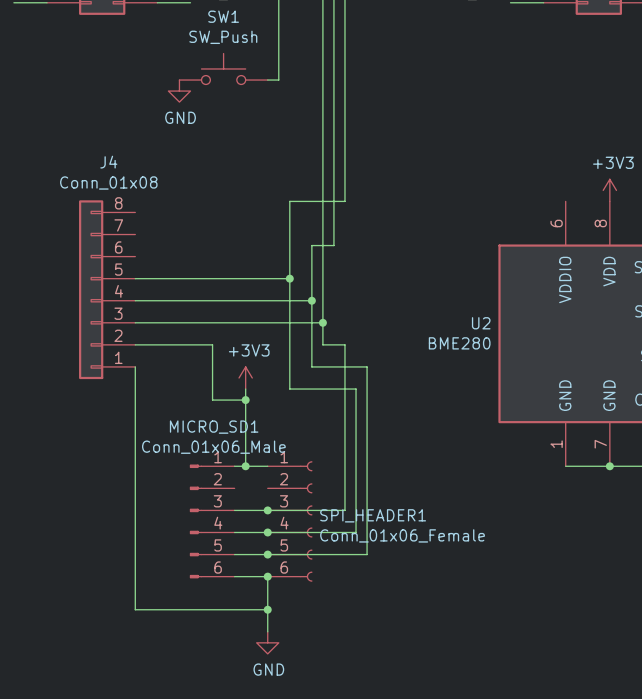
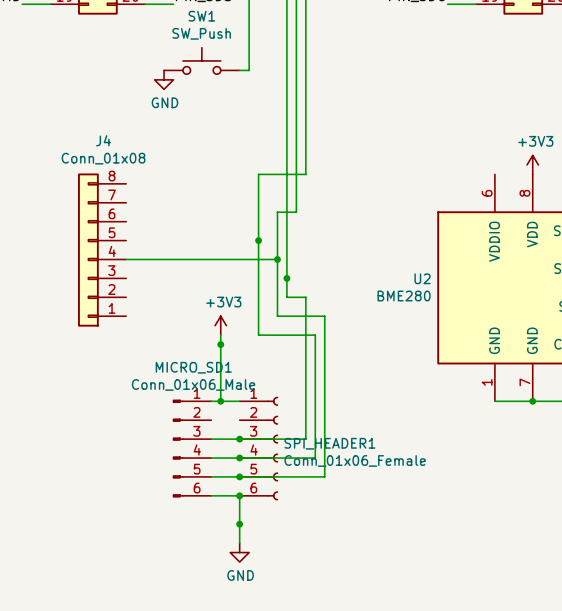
wire: (135, 278) (289, 278) -> none
wire: (135, 322) (322, 322) -> none
wire: (135, 344) (212, 344) (212, 400) (245, 400) -> none
wire: (135, 366) (135, 609) (267, 609) -> none

